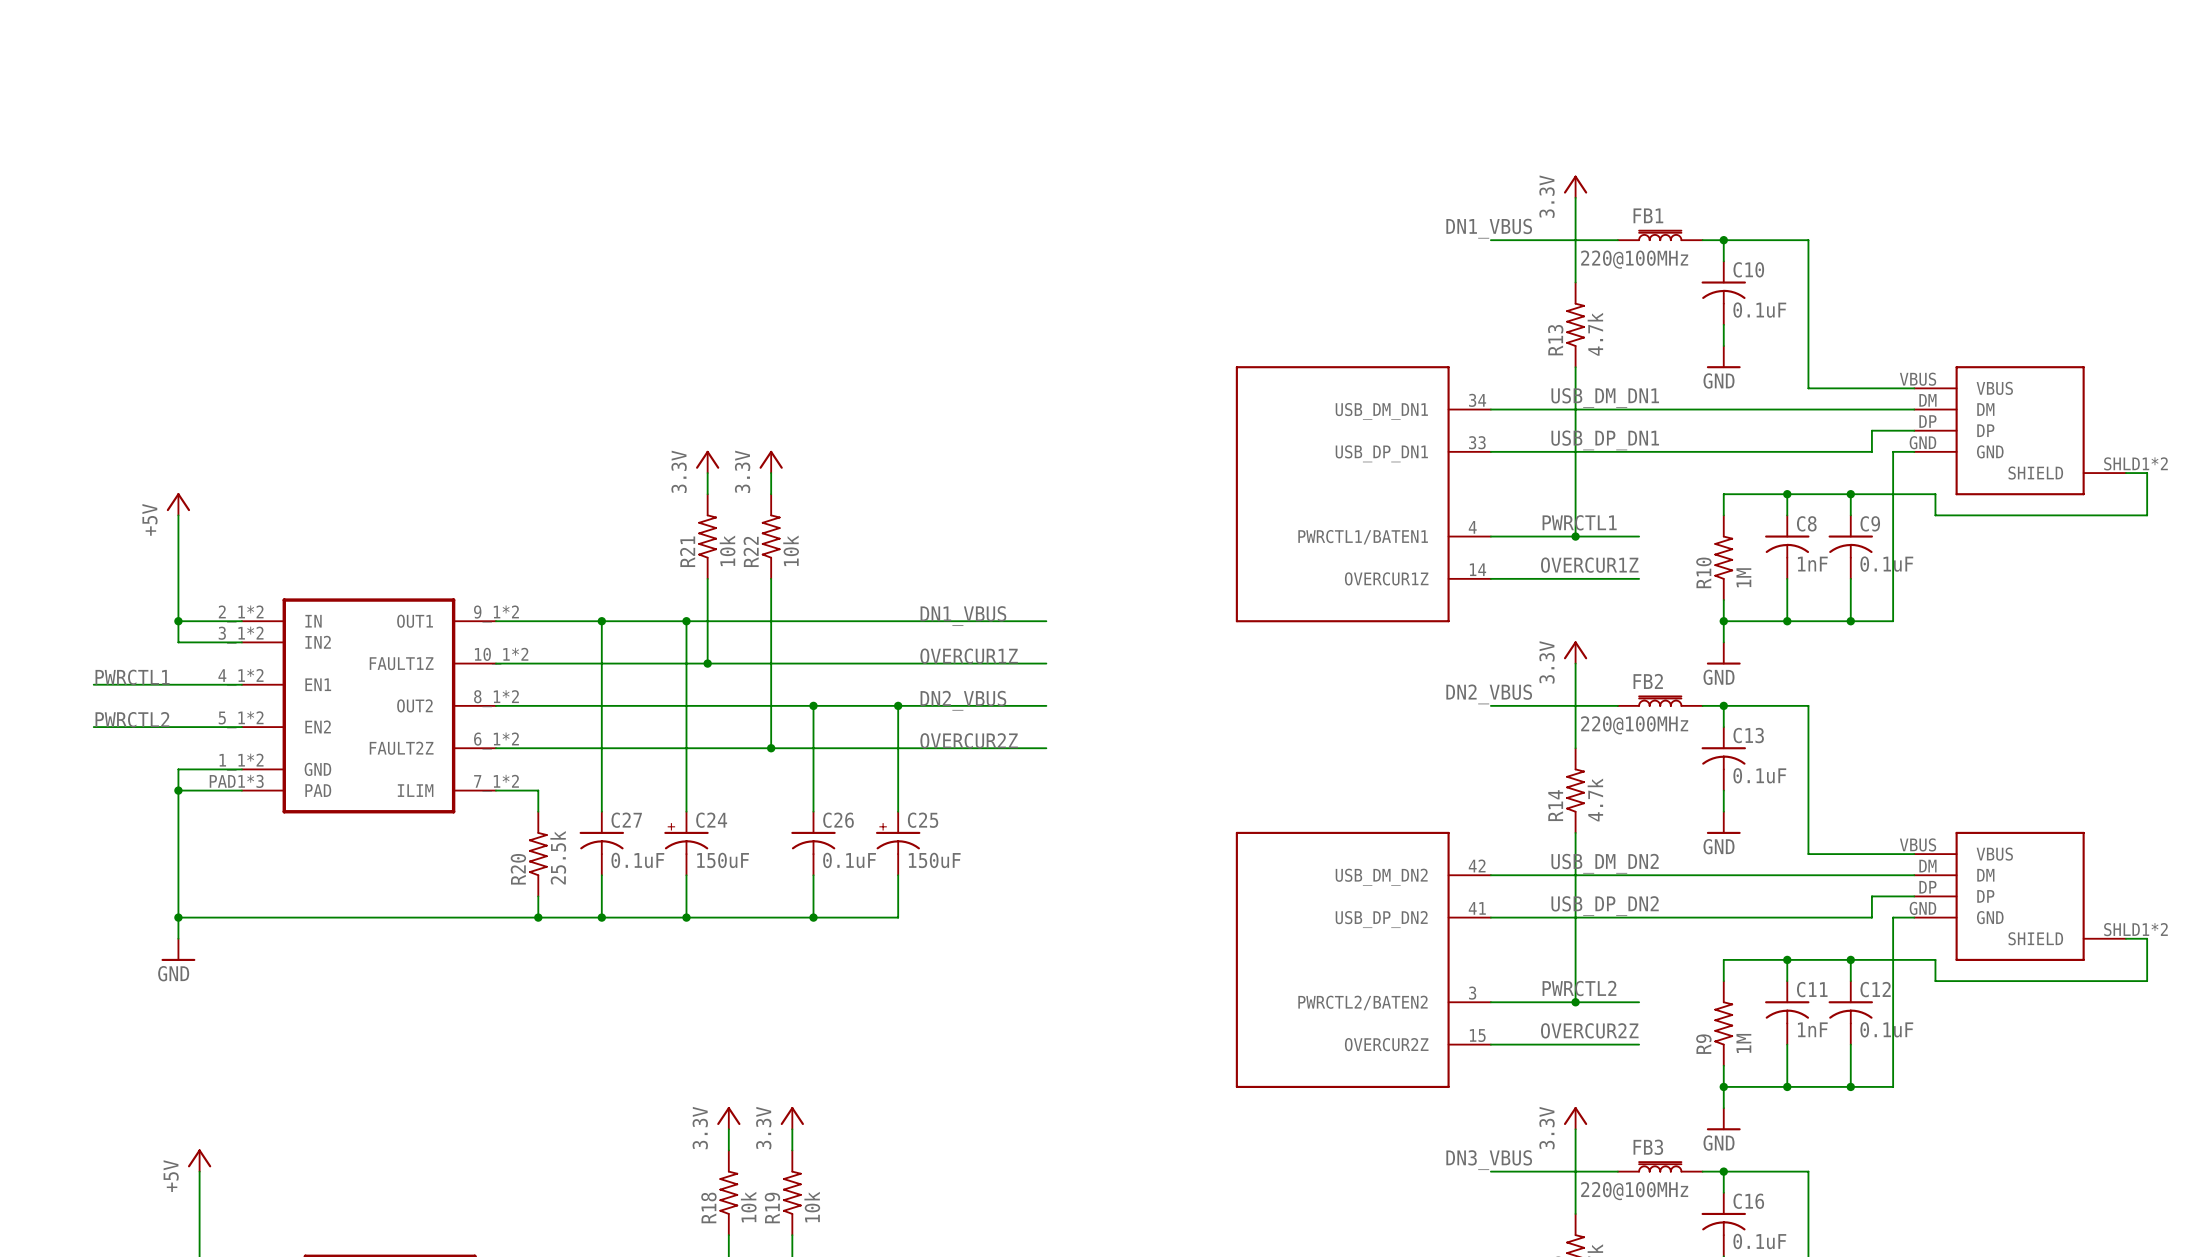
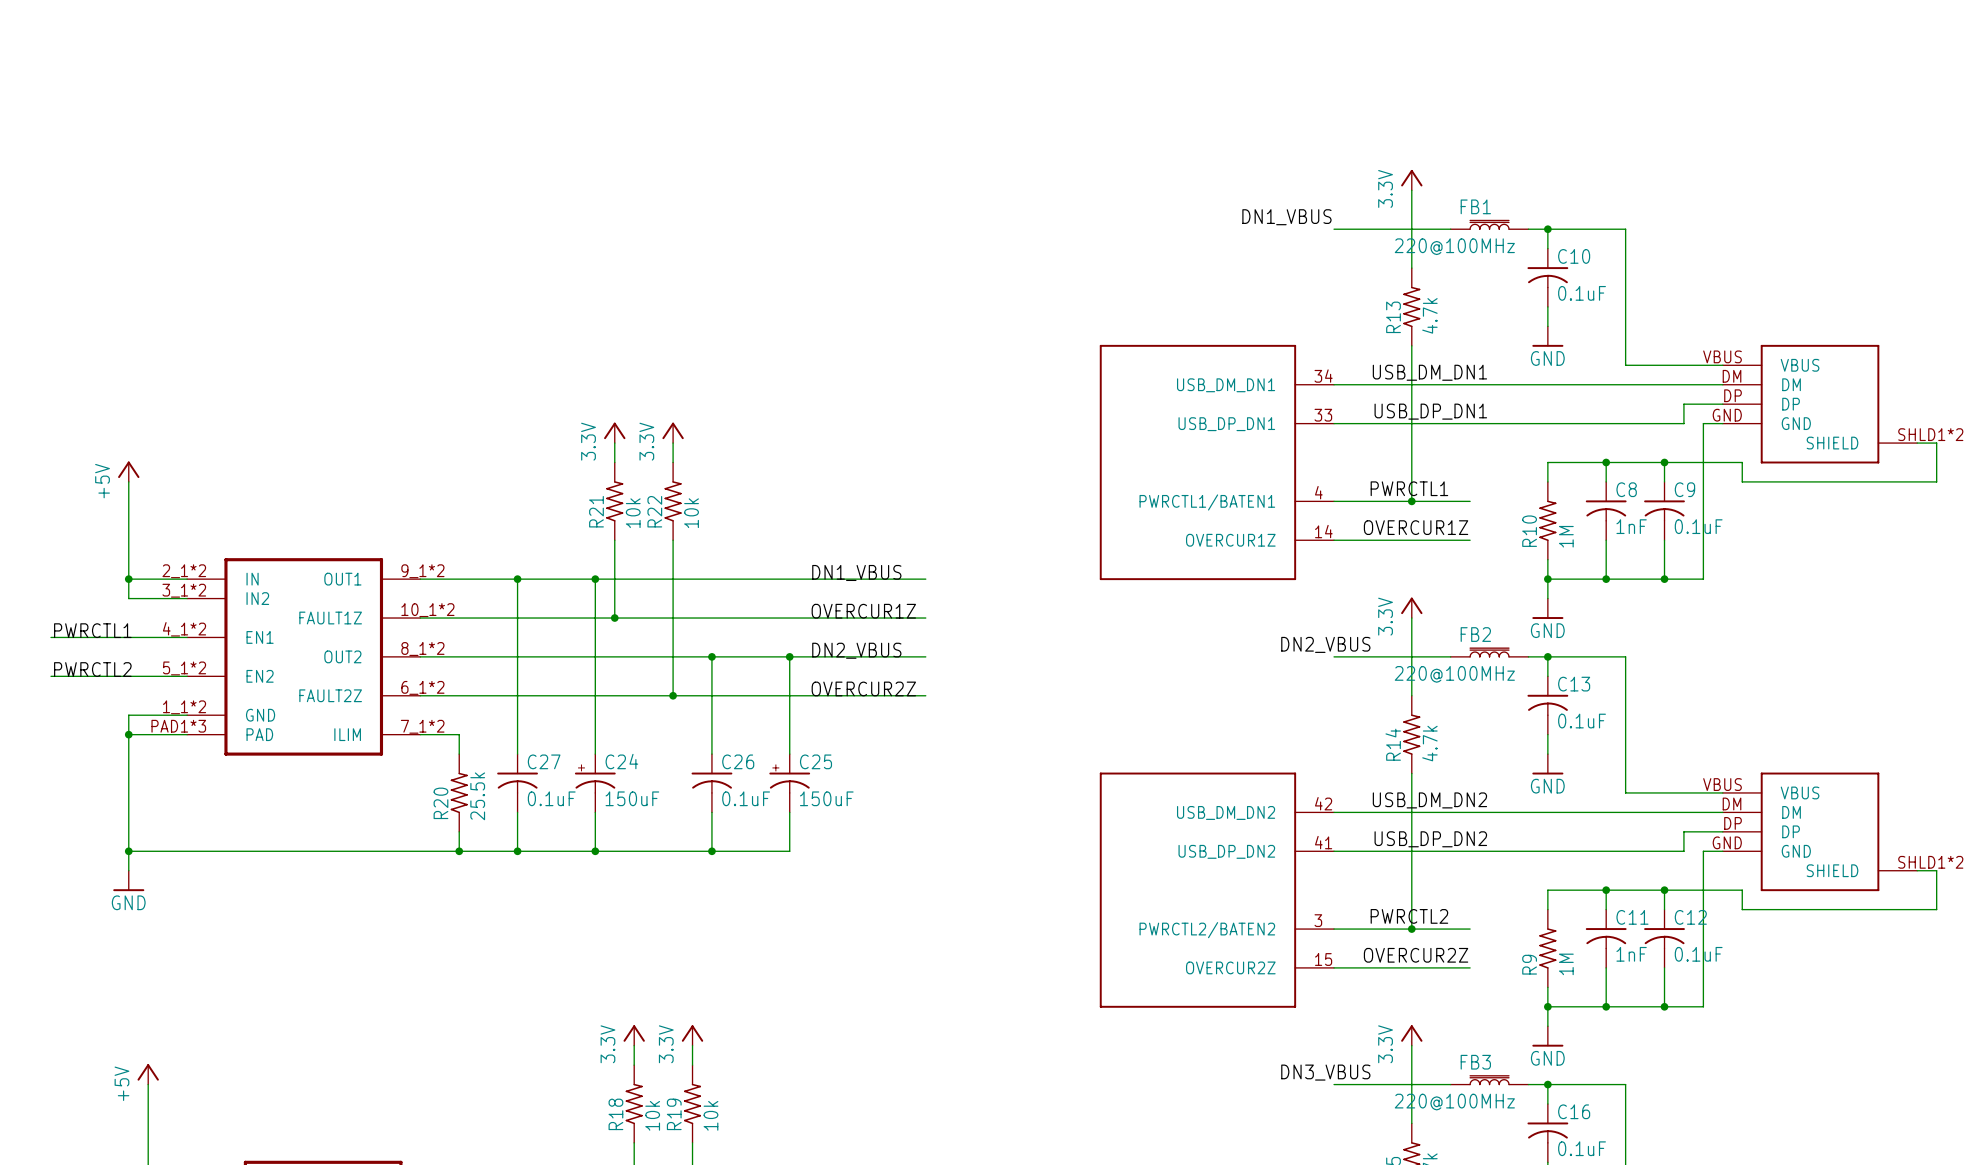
label position: DN1_VBUS (1489, 228) -> DN1_VBUS (1286, 217)

